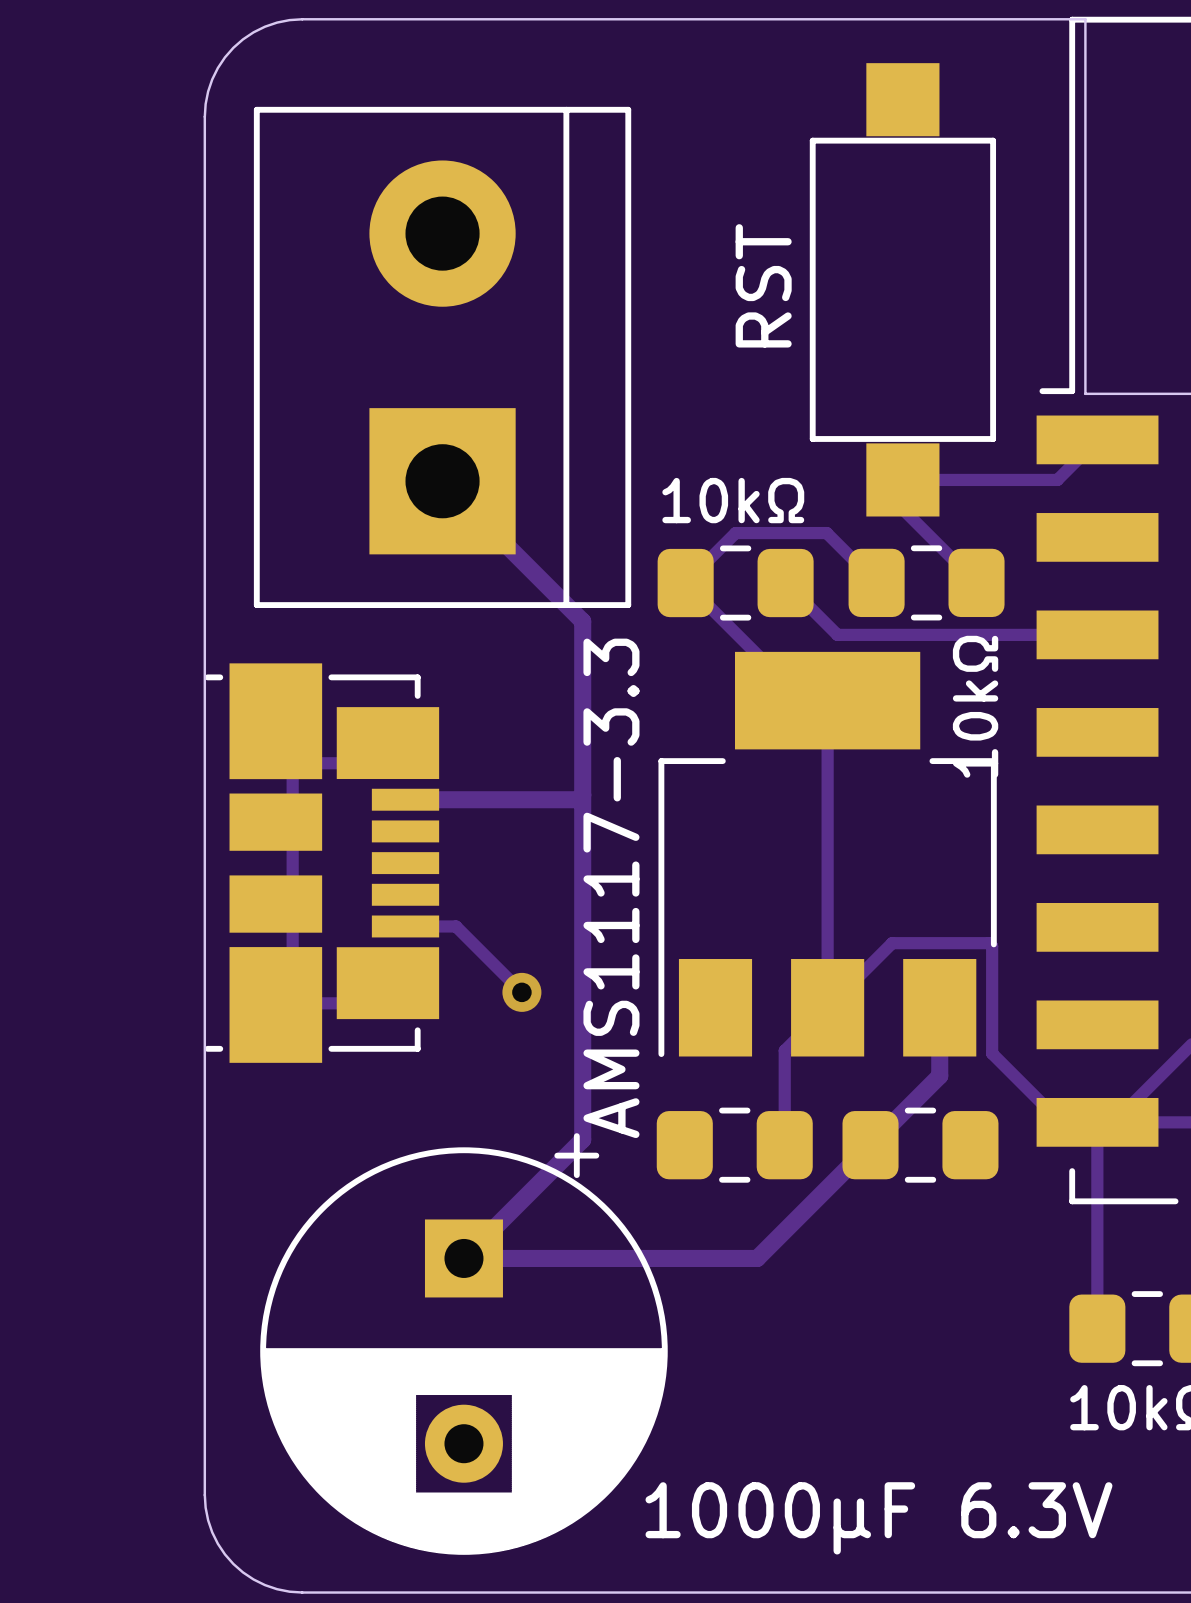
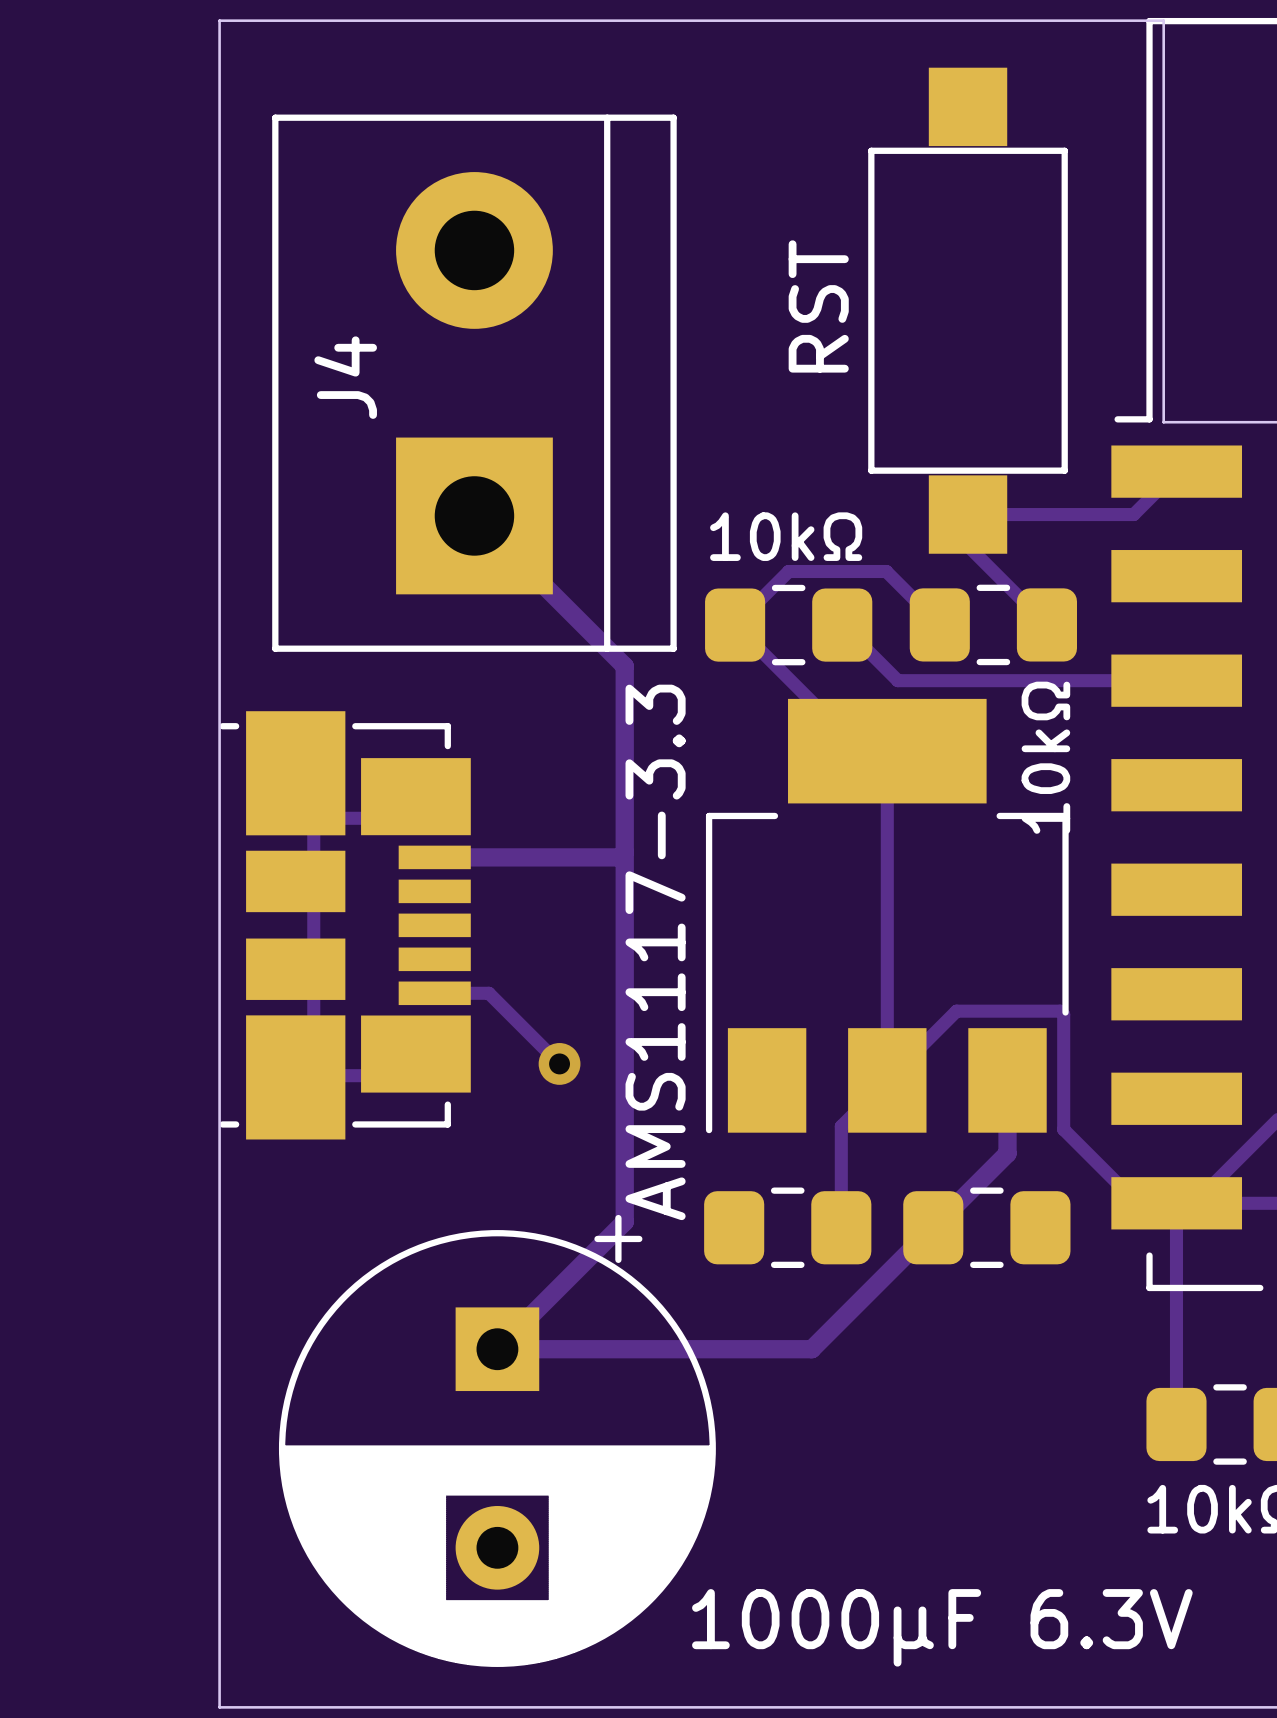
board edge: (302, 19) (277, 22) (264, 26) (253, 32) (233, 47) (217, 68) (212, 79) (208, 91) (204, 116) -> (324, 20) (219, 20) (219, 125)
J4 name: none -> J4 (345, 377)
board edge: (204, 1495) (208, 1520) (212, 1532) (217, 1543) (233, 1563) (253, 1579) (264, 1585) (277, 1589) (302, 1592) -> (219, 1602) (219, 1707) (324, 1707)

